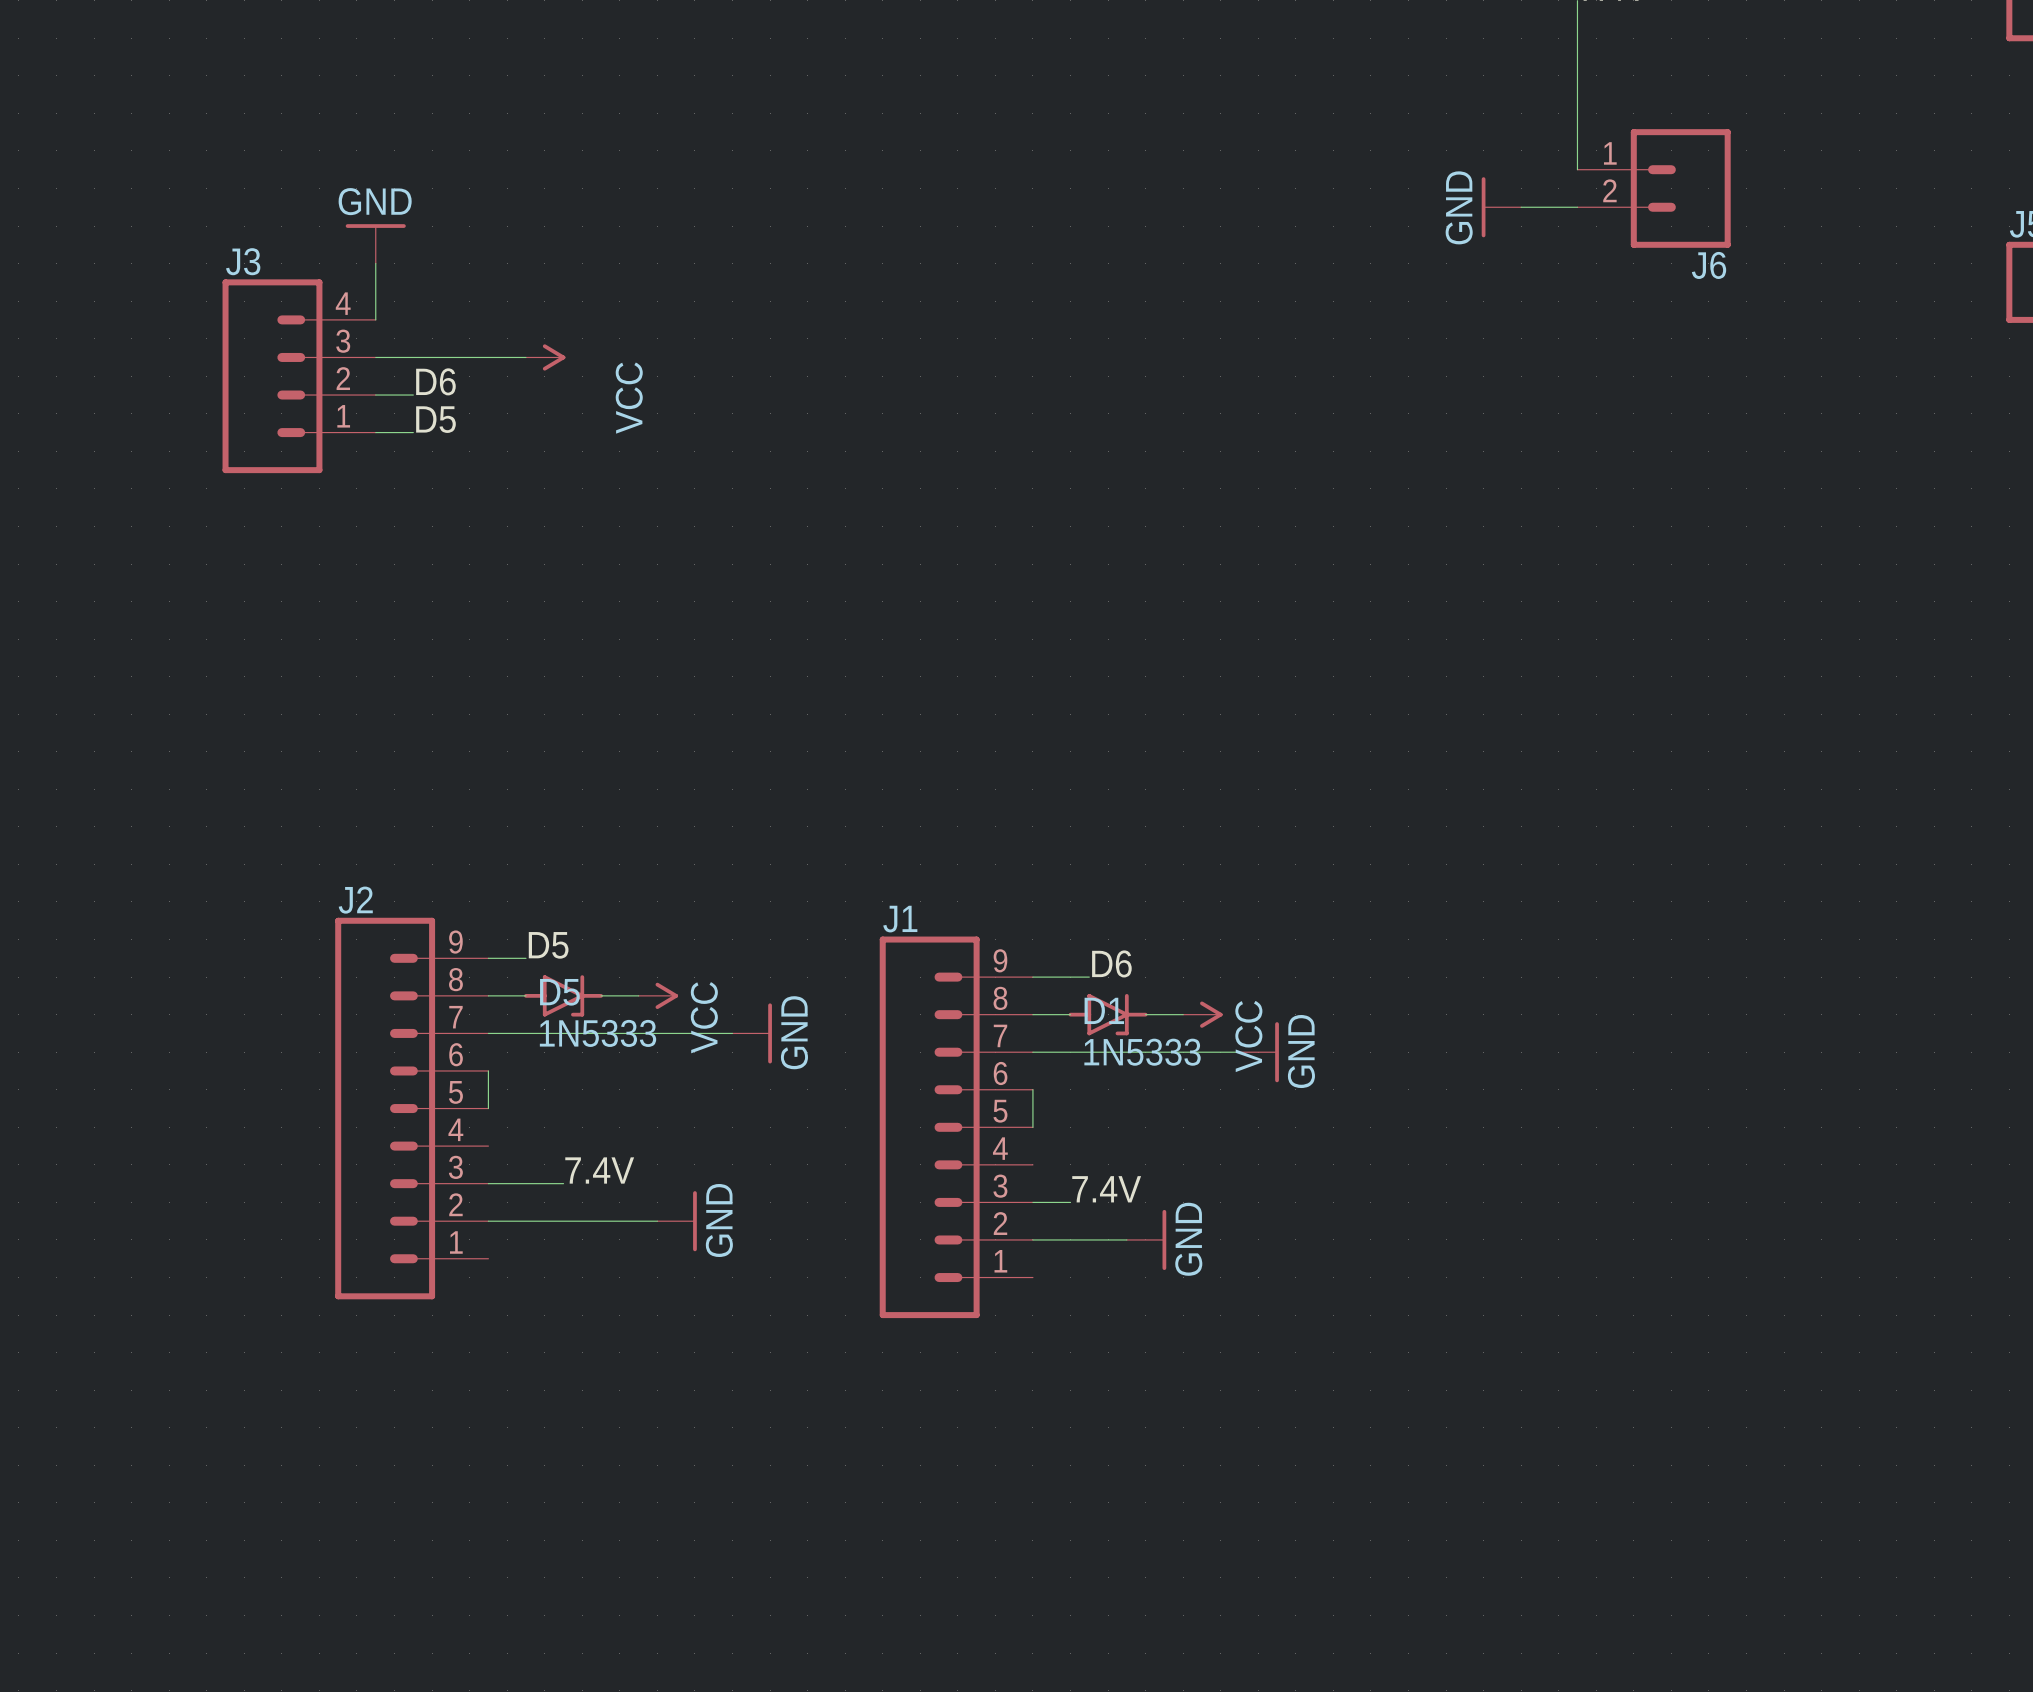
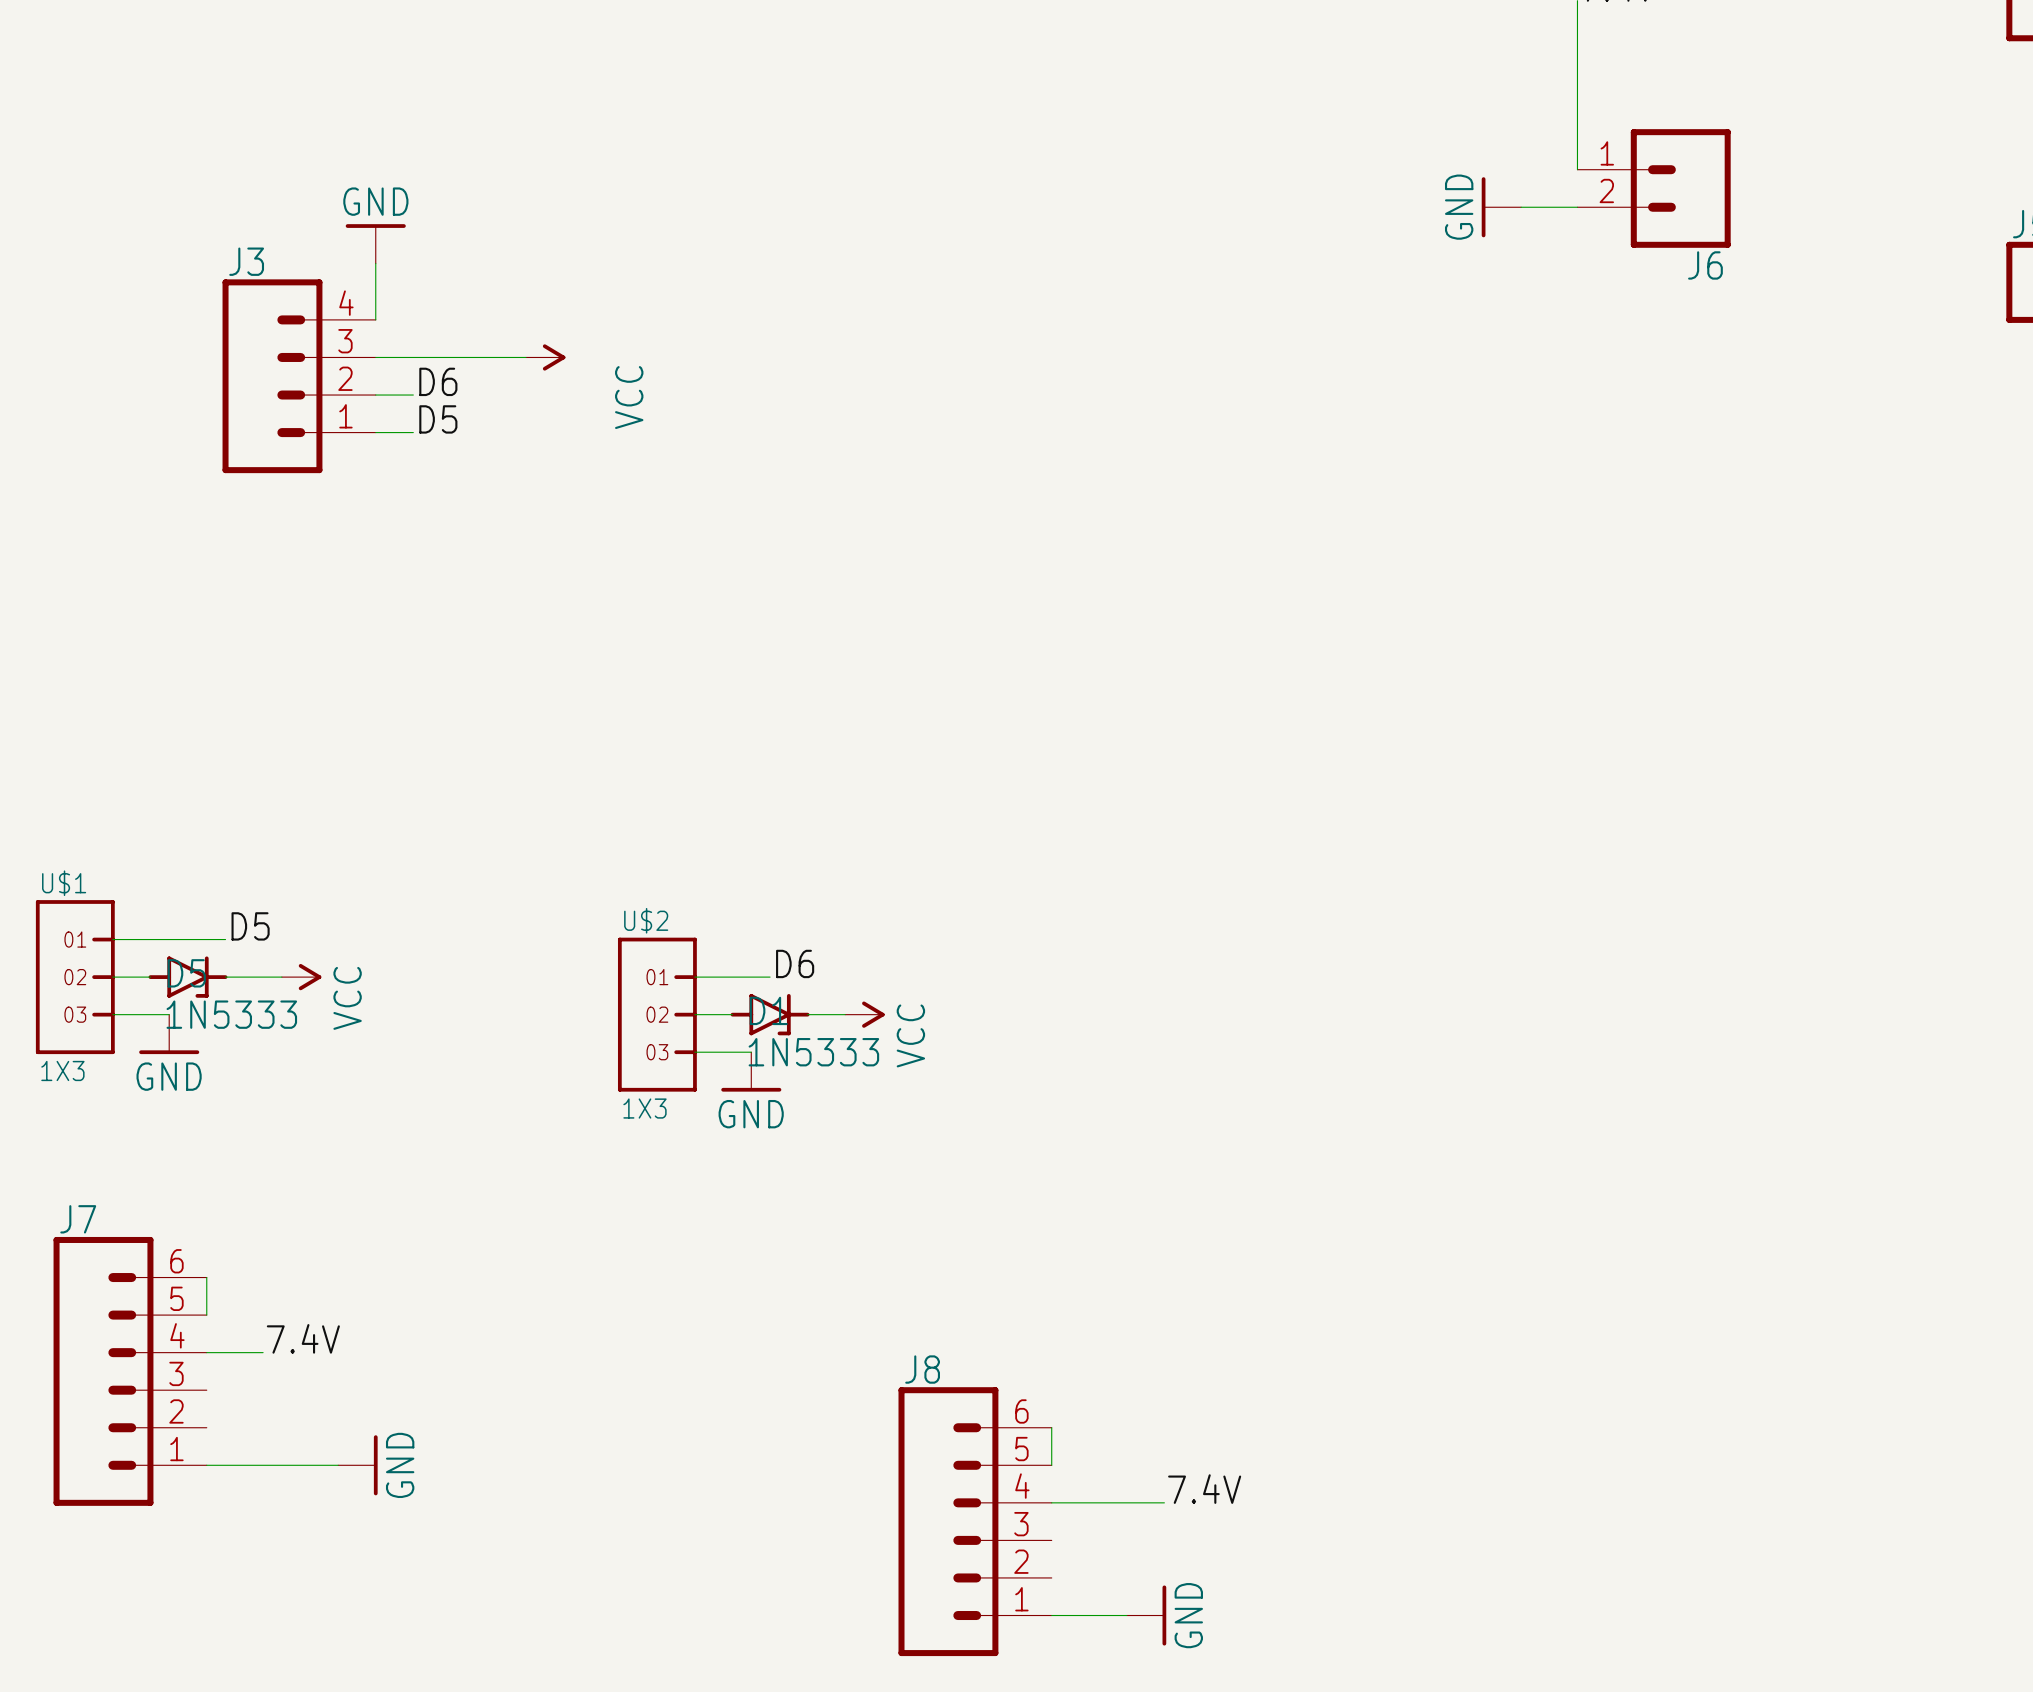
wire: none -> (112, 939) (225, 939)
label position: D5 (548, 945) -> D5 (250, 926)
wire: (488, 958) (525, 958) -> none
label position: D6 (1111, 963) -> D6 (795, 963)
U$1: none -> 1X3 (75, 977)
wire: none -> (112, 977) (150, 977)
wire: none -> (225, 977) (281, 977)
power symbol: none -> VCC (301, 977)
wire: (1032, 977) (1089, 977) -> (694, 1052) (751, 1052)
wire: (488, 995) (525, 995) -> (694, 1014) (732, 1014)
D5 position: (563, 995) -> (187, 977)
wire: (601, 995) (638, 995) -> (807, 1014) (845, 1014)
power symbol: VCC (658, 995) -> none
wire: none -> (112, 1014) (169, 1014)
U$2: none -> 1X3 (657, 1014)
power symbol: none -> VCC (864, 1014)
wire: (1032, 1014) (1070, 1014) -> none
D1 position: (1108, 1014) -> (770, 1014)
wire: (1145, 1014) (1183, 1014) -> none
power symbol: VCC (1202, 1014) -> none
wire: (488, 1033) (732, 1033) -> none
power symbol position: GND (752, 1033) -> GND (751, 1071)
power symbol rotation: 0° (770, 1033) -> 90° clockwise (751, 1089)
power symbol: none -> GND (169, 1034)
wire: (1032, 1052) (1239, 1052) -> none
power symbol: GND (1259, 1052) -> none
wire: (488, 1070) (488, 1108) -> (206, 1277) (206, 1315)
wire: (1032, 1089) (1032, 1127) -> (1051, 1427) (1051, 1465)
J2: (411, 1108) -> none
J1: (956, 1127) -> none
label: 7.4V (599, 1170) -> none
wire: (488, 1183) (563, 1183) -> (694, 977) (770, 977)
label position: 7.4V (1106, 1189) -> 7.4V (1204, 1489)
wire: (1032, 1202) (1070, 1202) -> none
wire: (488, 1221) (657, 1221) -> none
power symbol: GND (677, 1221) -> none
wire: (1032, 1239) (1126, 1239) -> none
power symbol: GND (1146, 1239) -> none
label: none -> 7.4V (303, 1338)
wire: none -> (206, 1352) (263, 1352)
J7: none -> (130, 1371)
wire: none -> (206, 1465) (338, 1465)
power symbol: none -> GND (357, 1465)
wire: none -> (1051, 1502) (1164, 1502)
J8: none -> (975, 1521)
wire: none -> (1051, 1615) (1126, 1615)
power symbol: none -> GND (1146, 1615)

